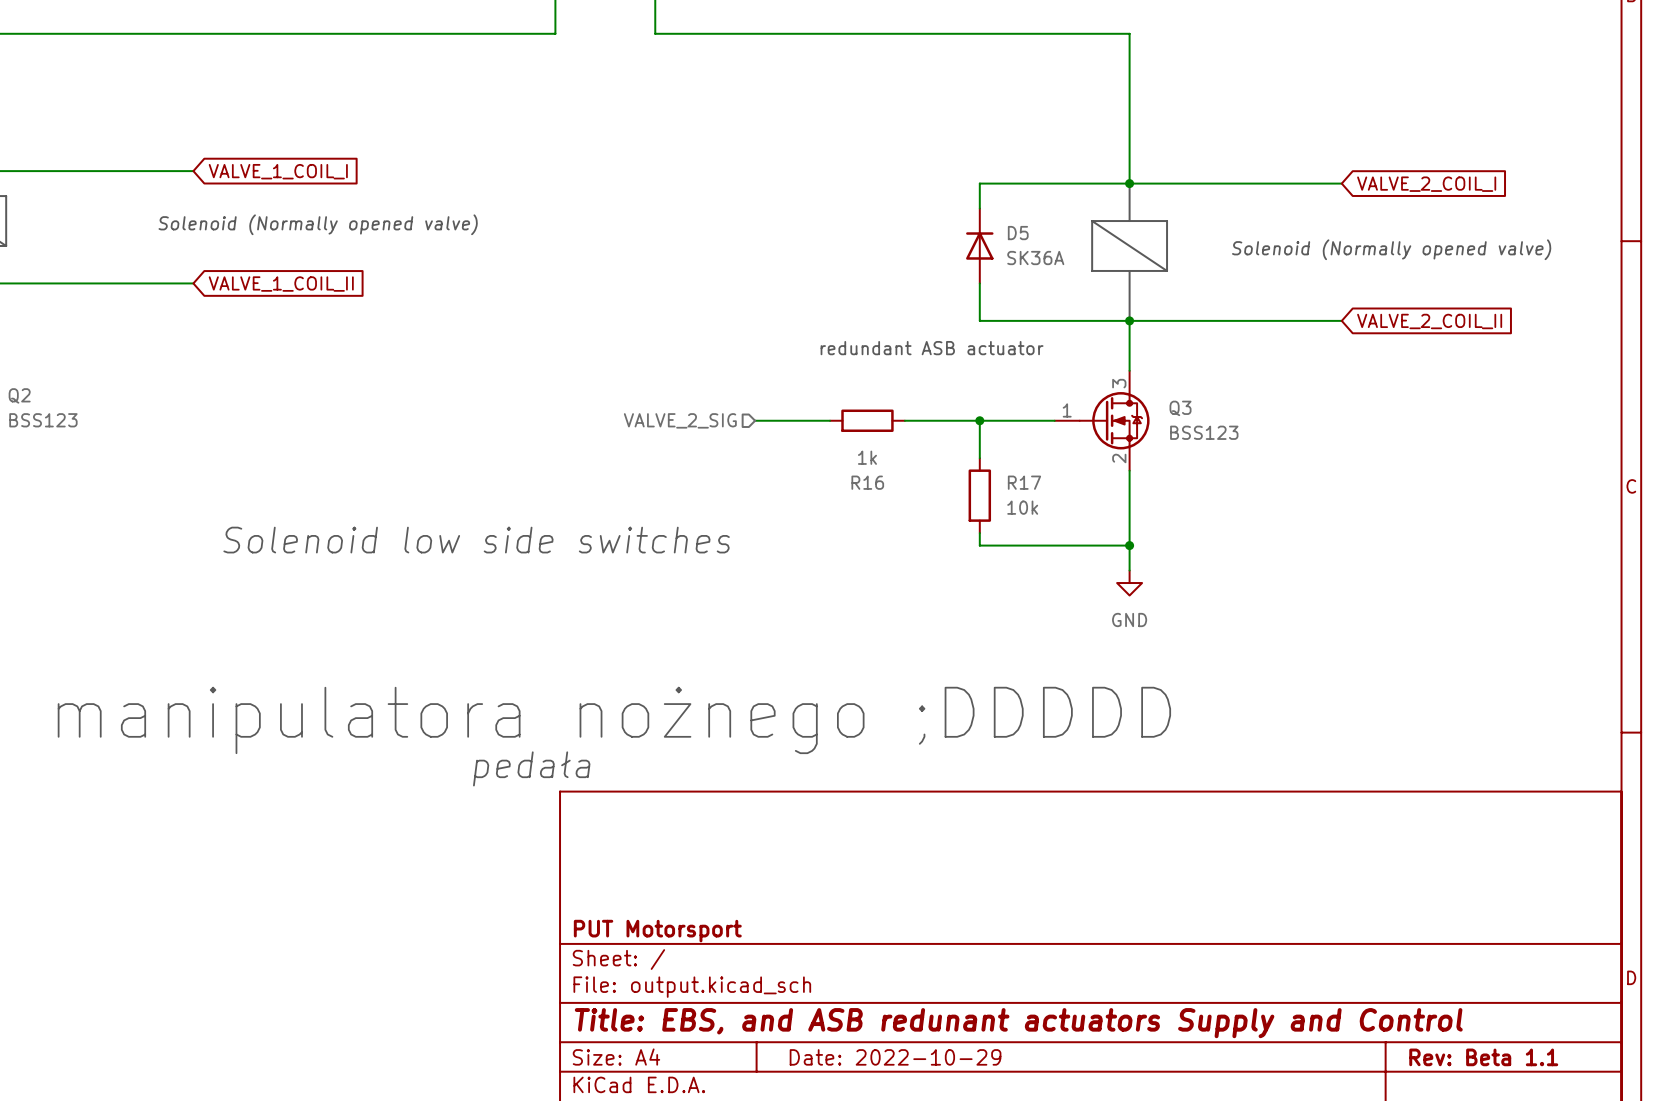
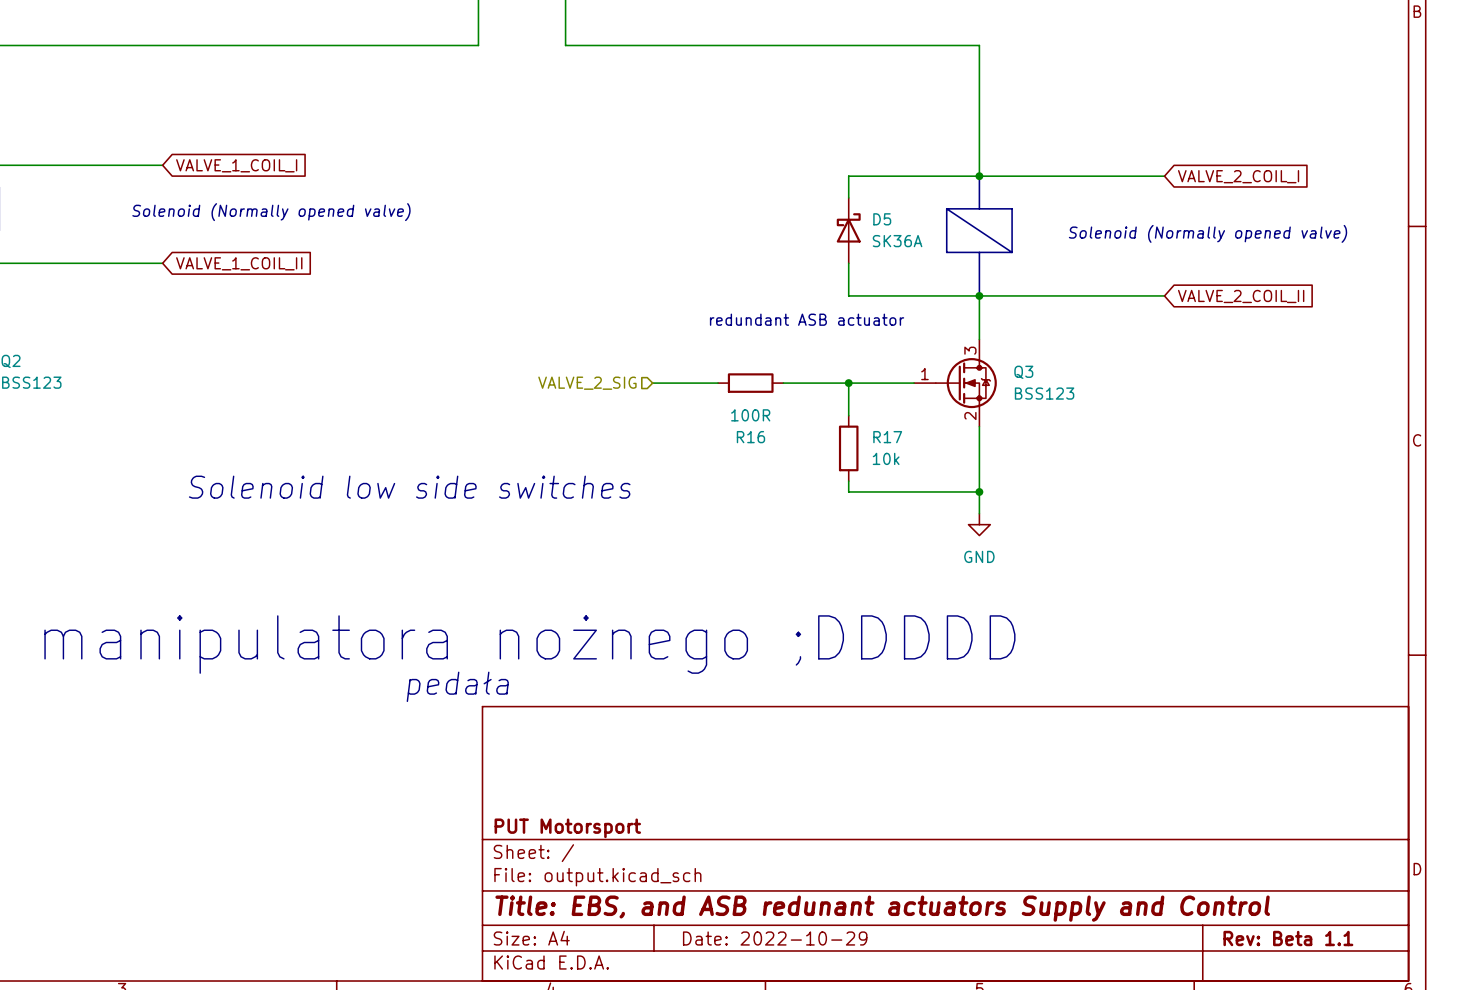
D5 symbol: [966, 208, 994, 284] -> [836, 197, 861, 264]
R16 value: 1k (867, 457) -> 100R (750, 415)

